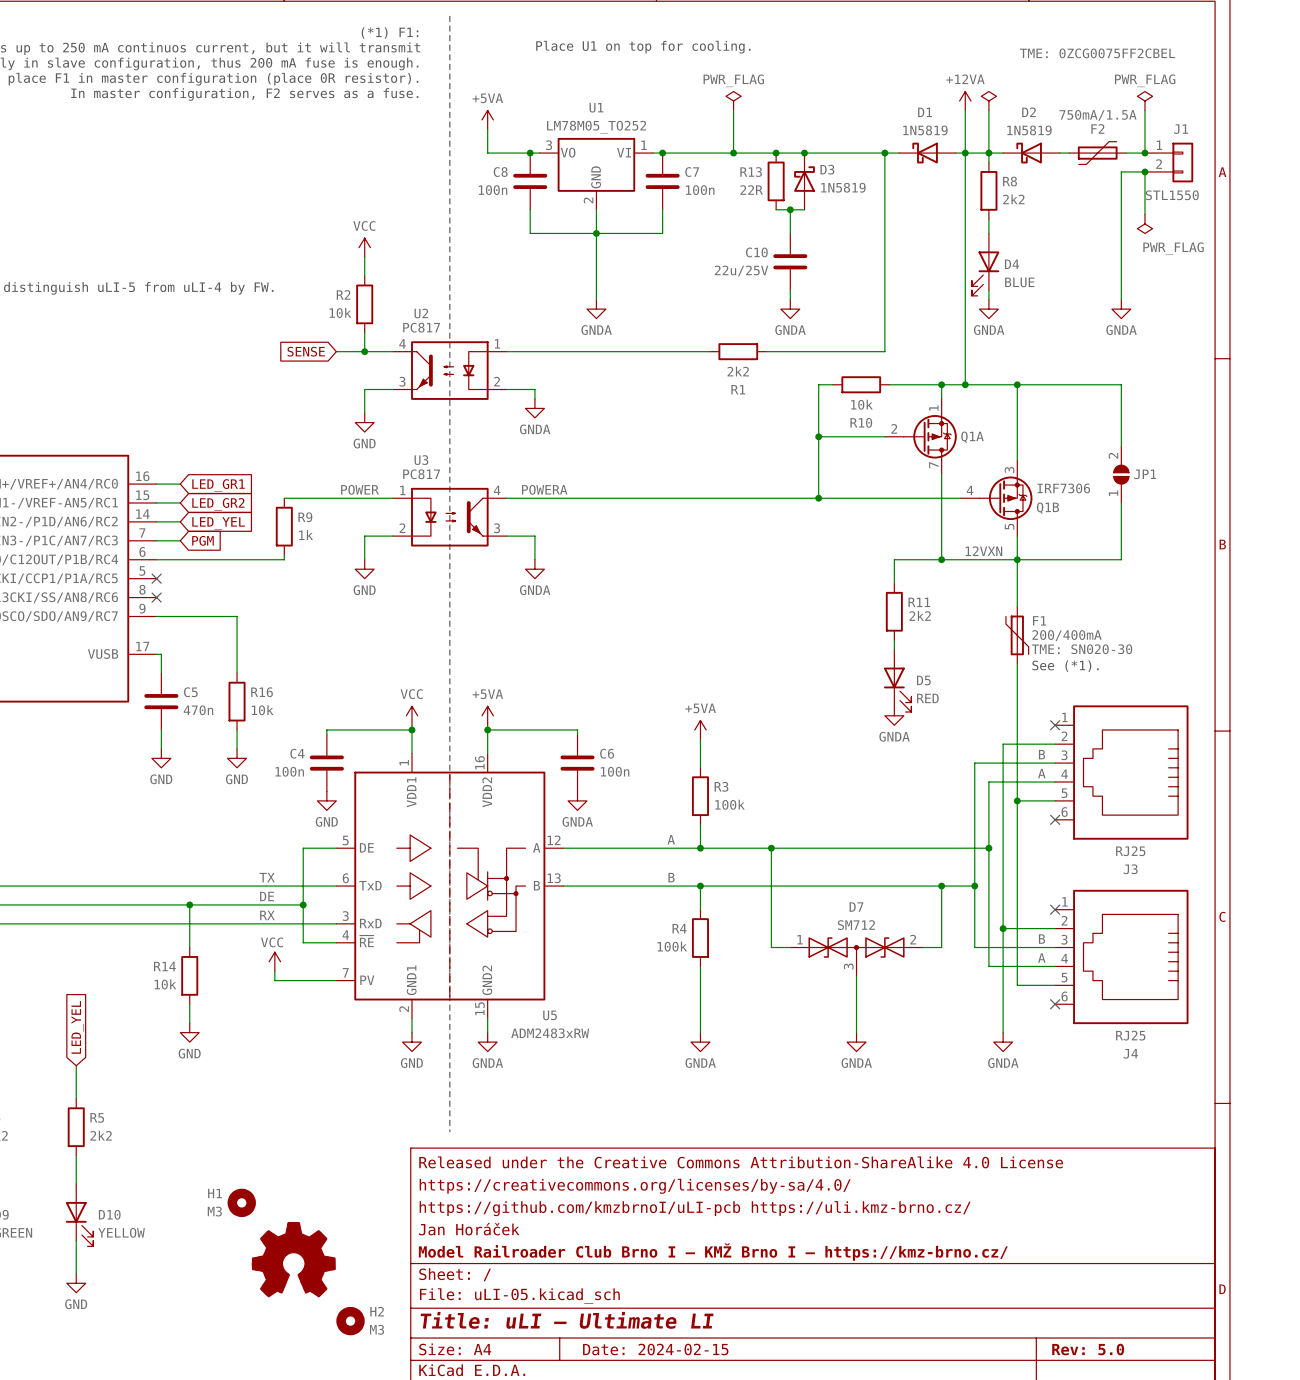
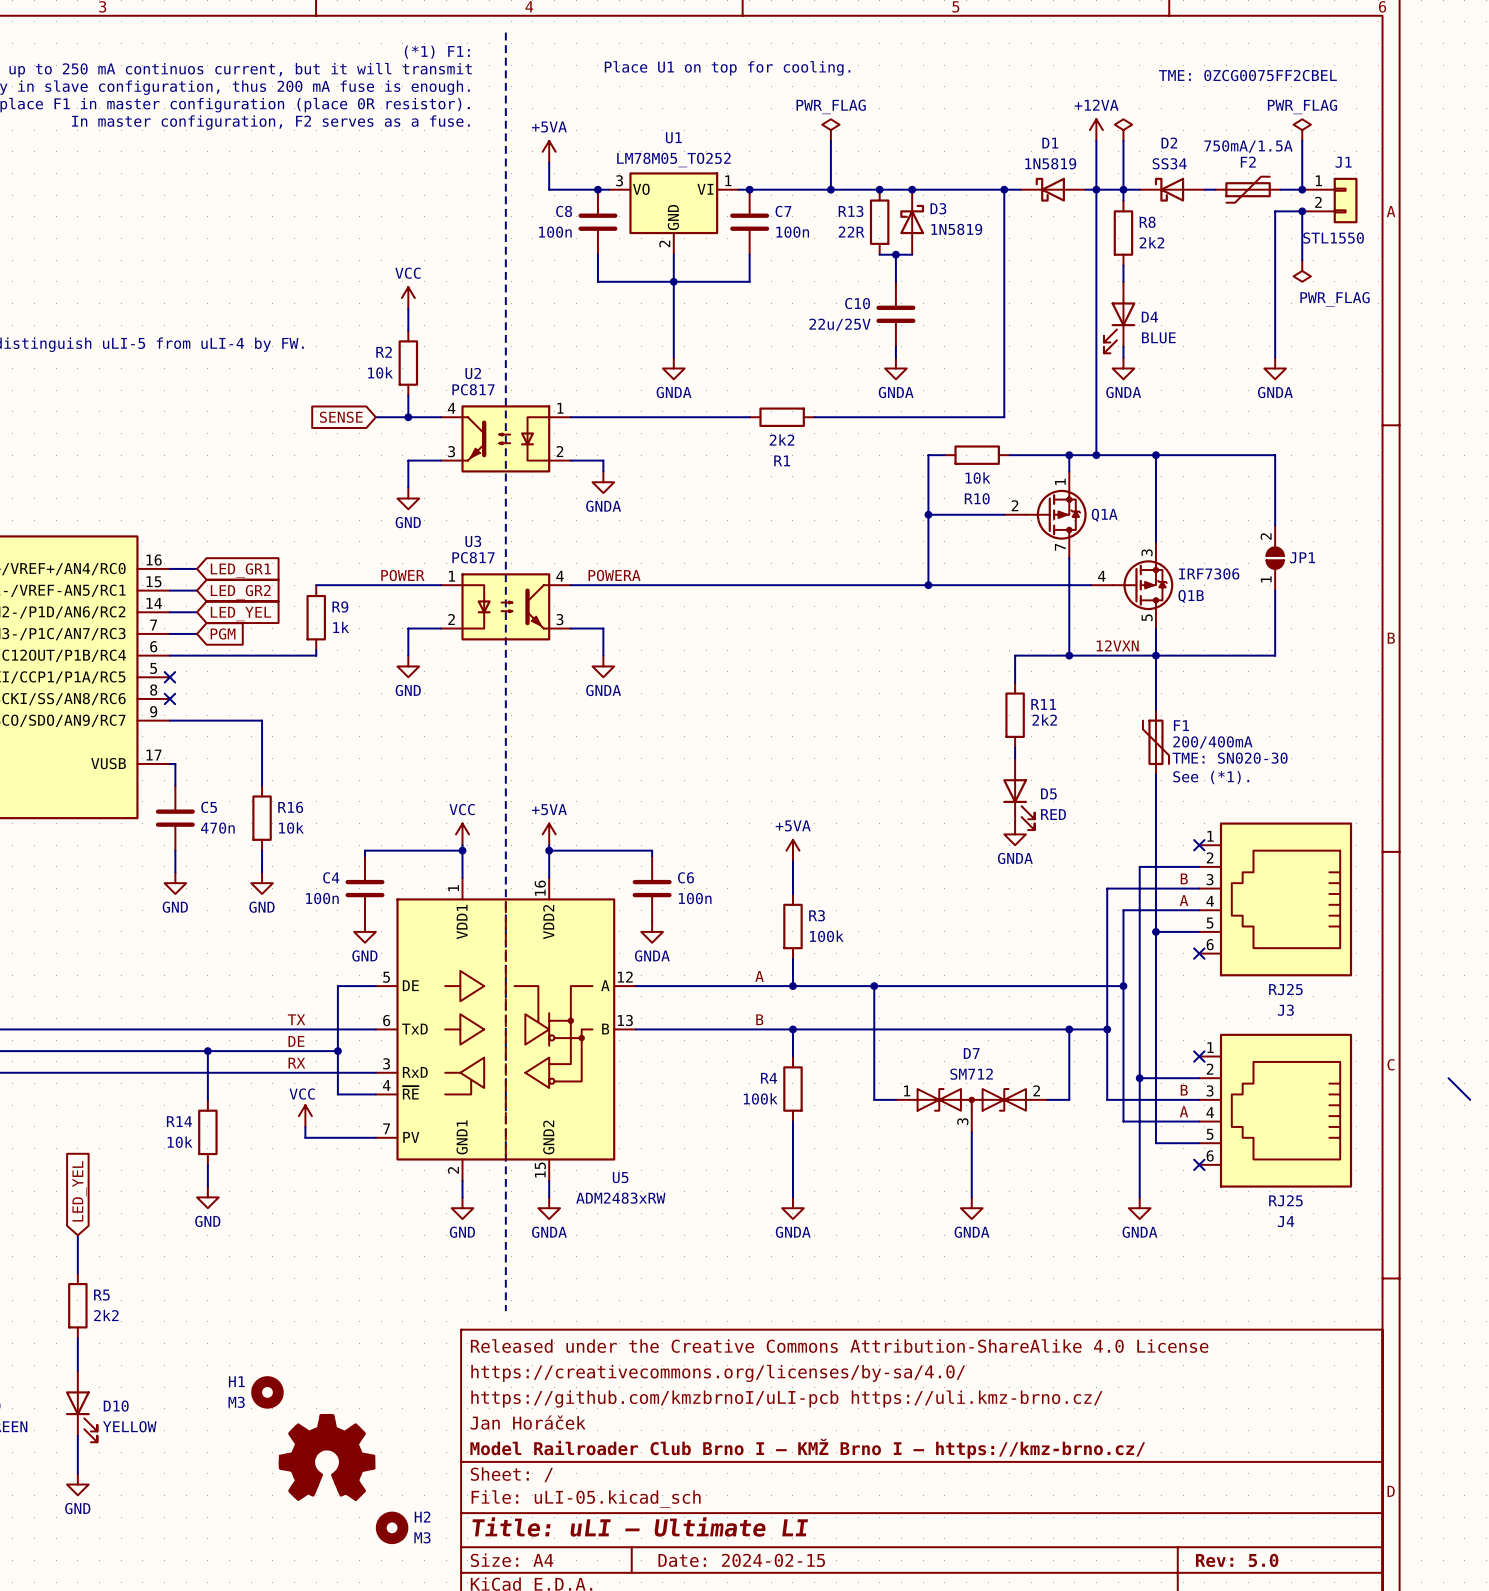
D2 value: 1N5819 (1029, 130) -> SS34 (1169, 163)
wire: (662, 351) (709, 351) -> (814, 417) (868, 417)
R1 position: (738, 351) -> (782, 417)
wire: none -> (1448, 1078) (1470, 1099)

